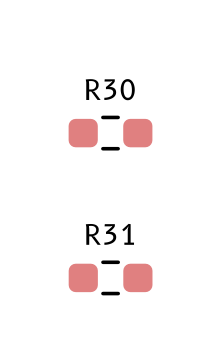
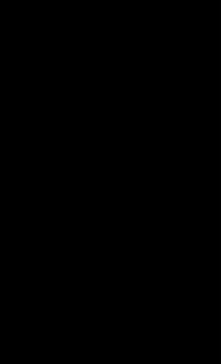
R30: (110, 133) -> none
R31: (110, 277) -> none

